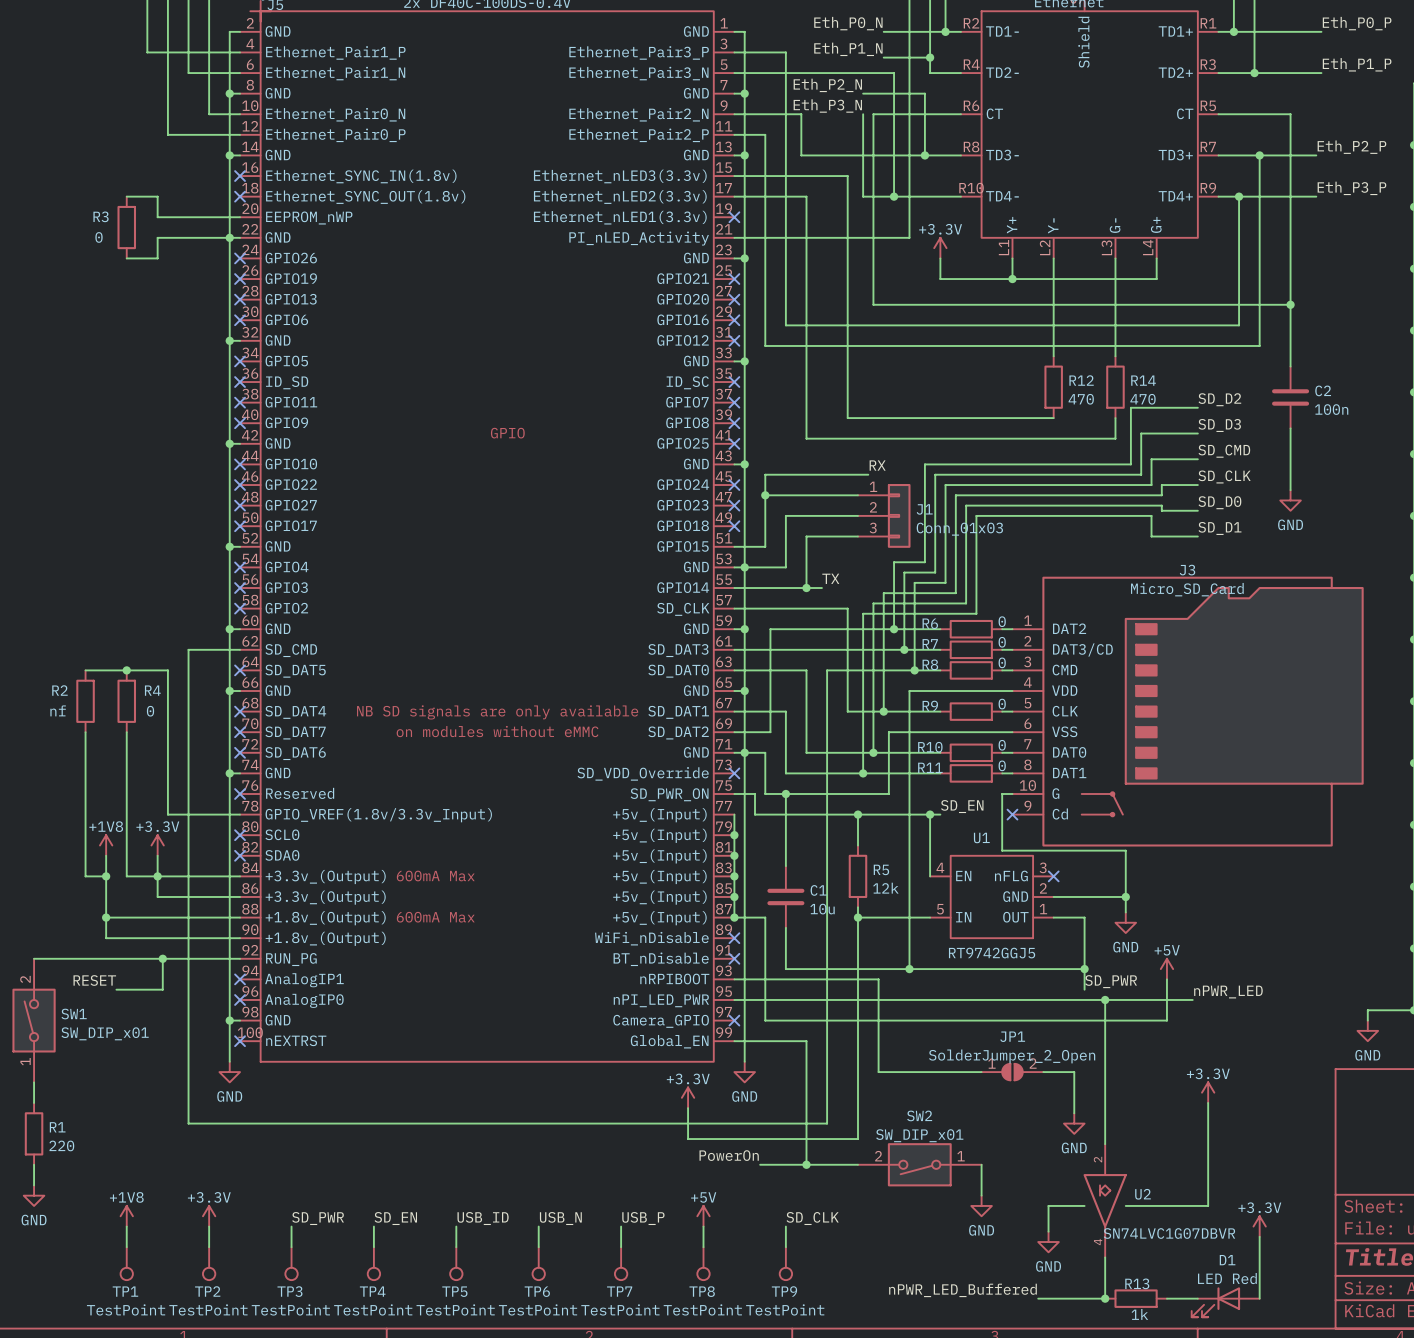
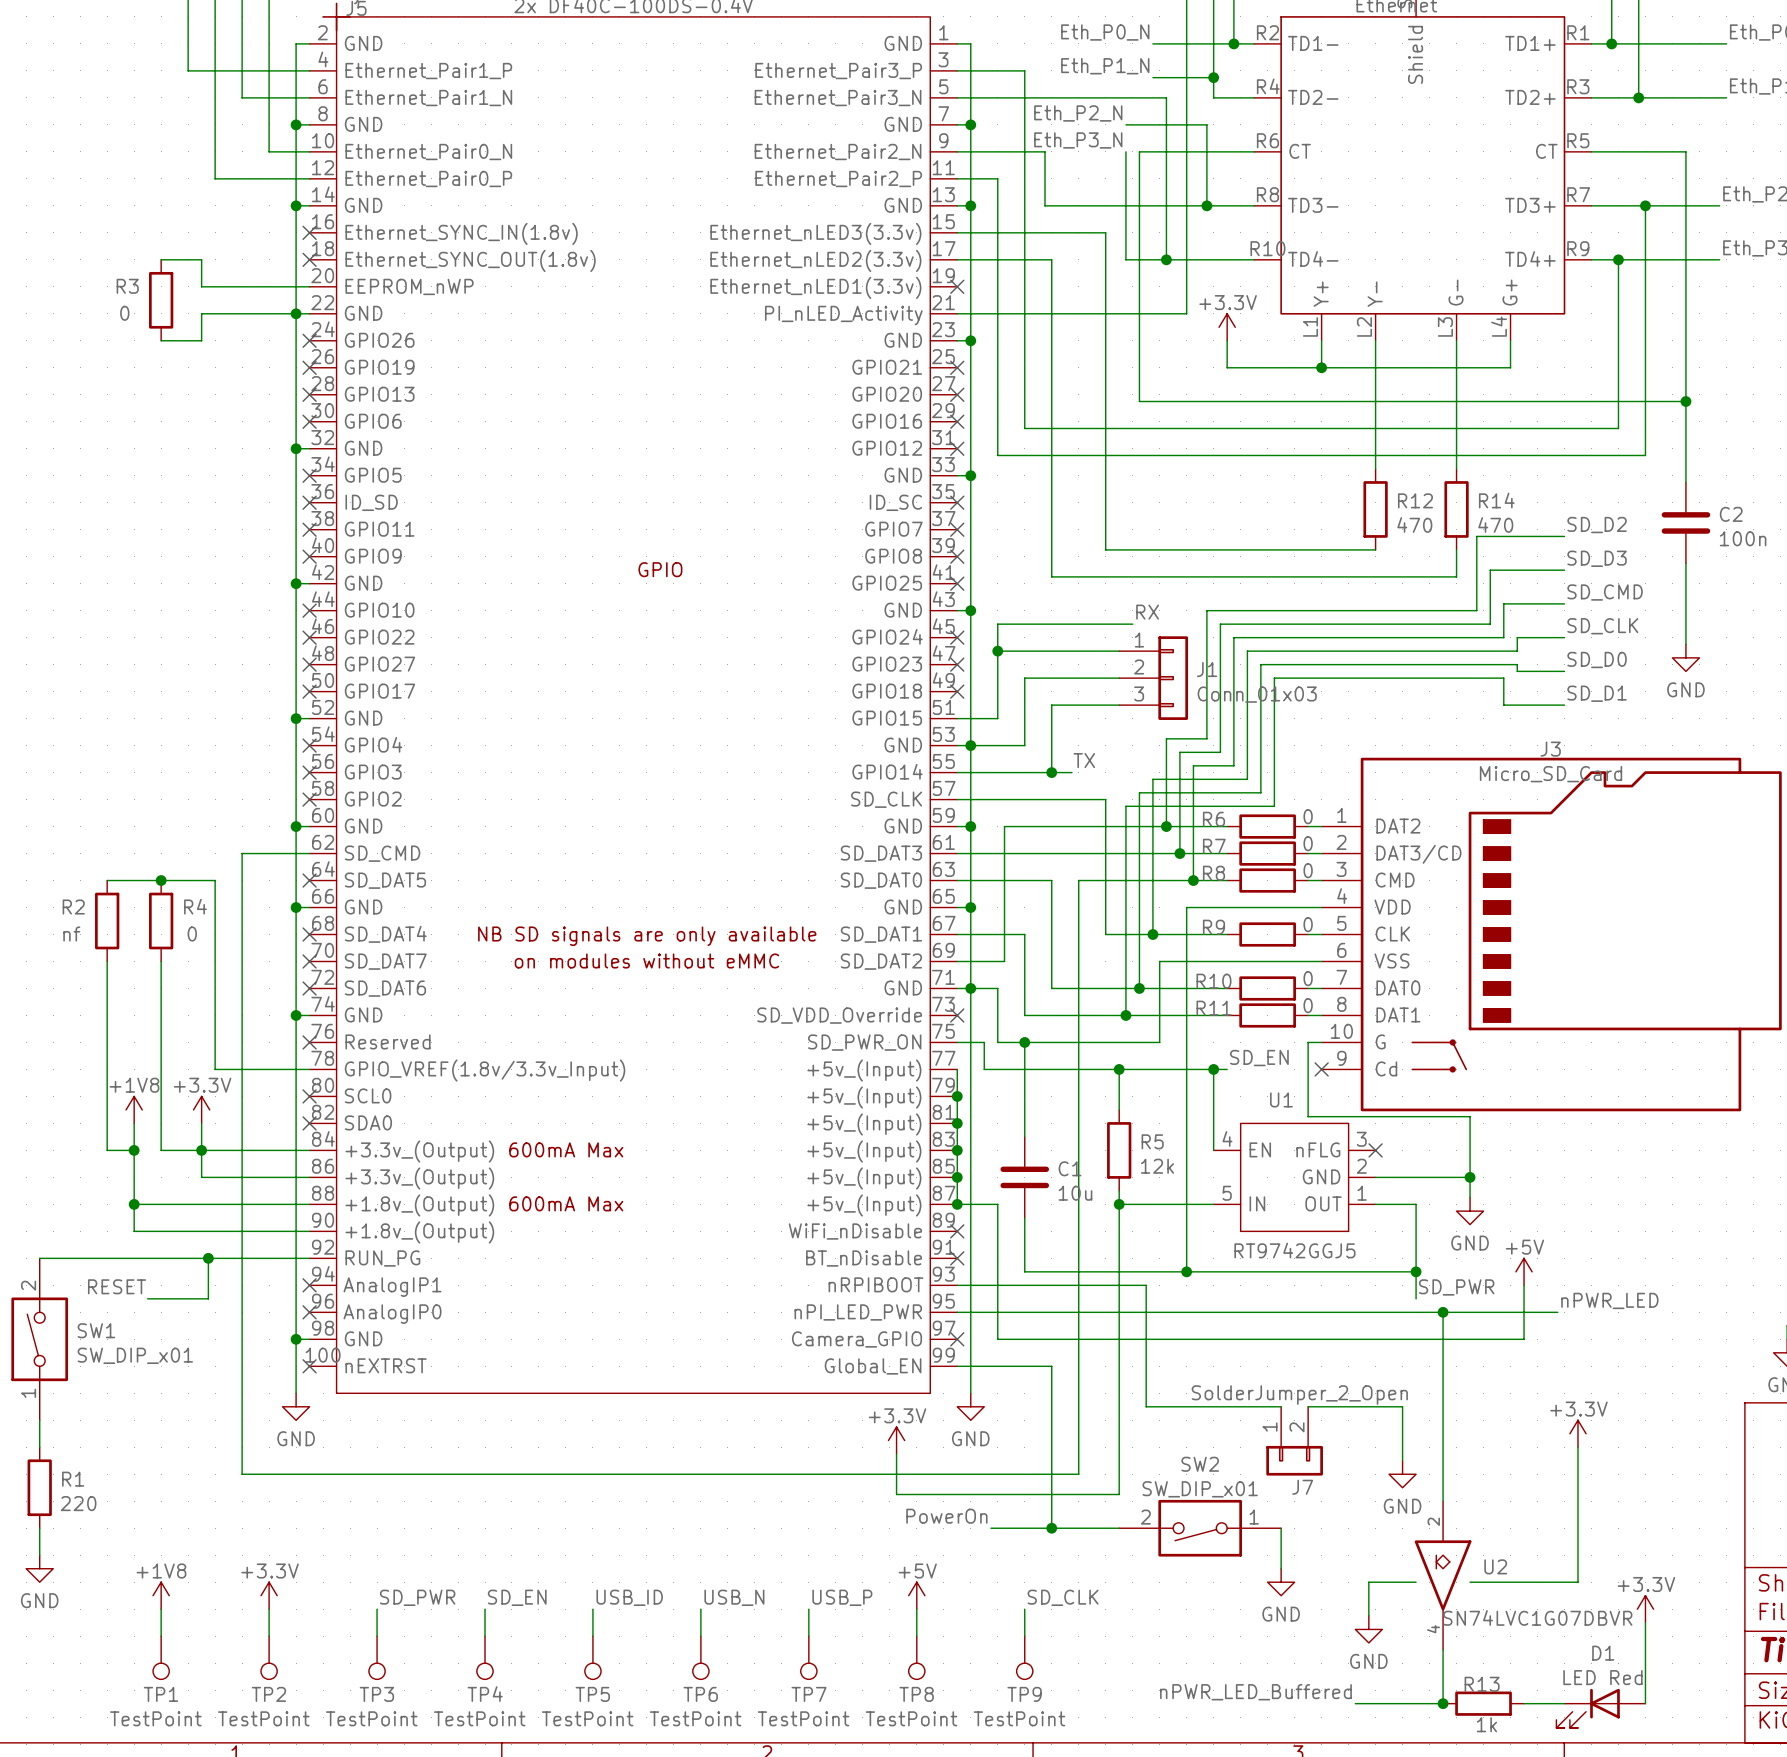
JP1: SolderJumper_2_Open (1012, 1072) -> none
J7: none -> SolderJumper_2_Open (1294, 1441)

